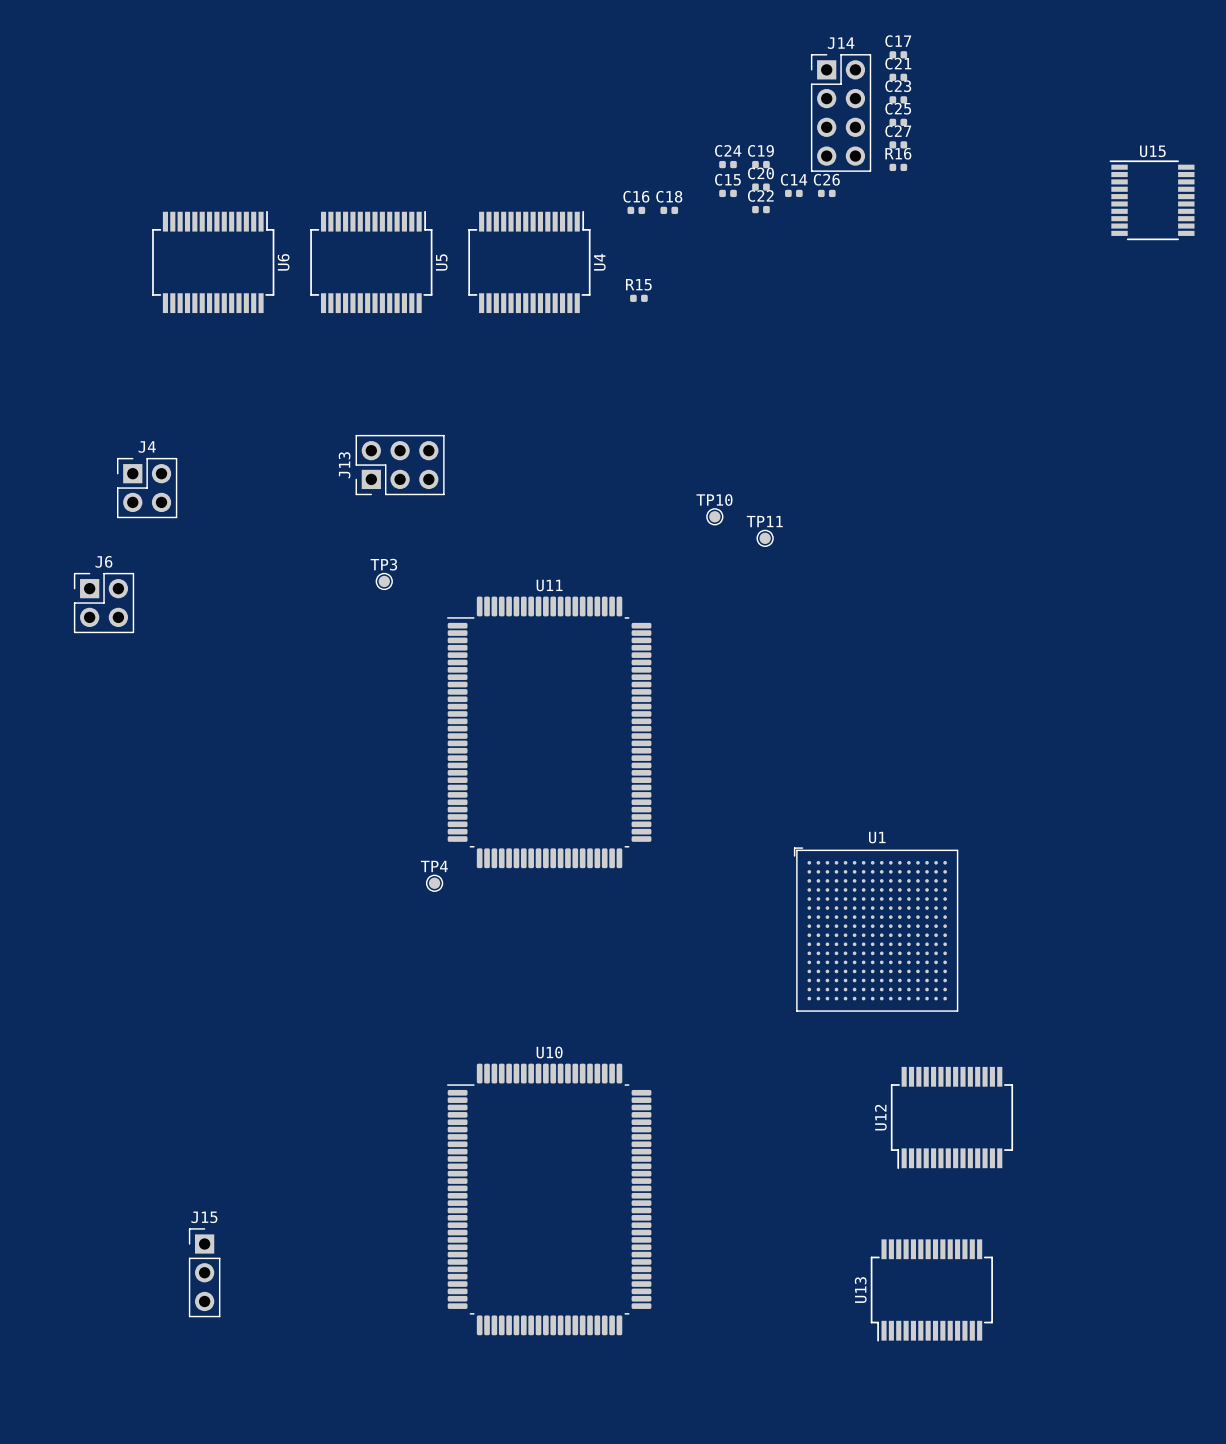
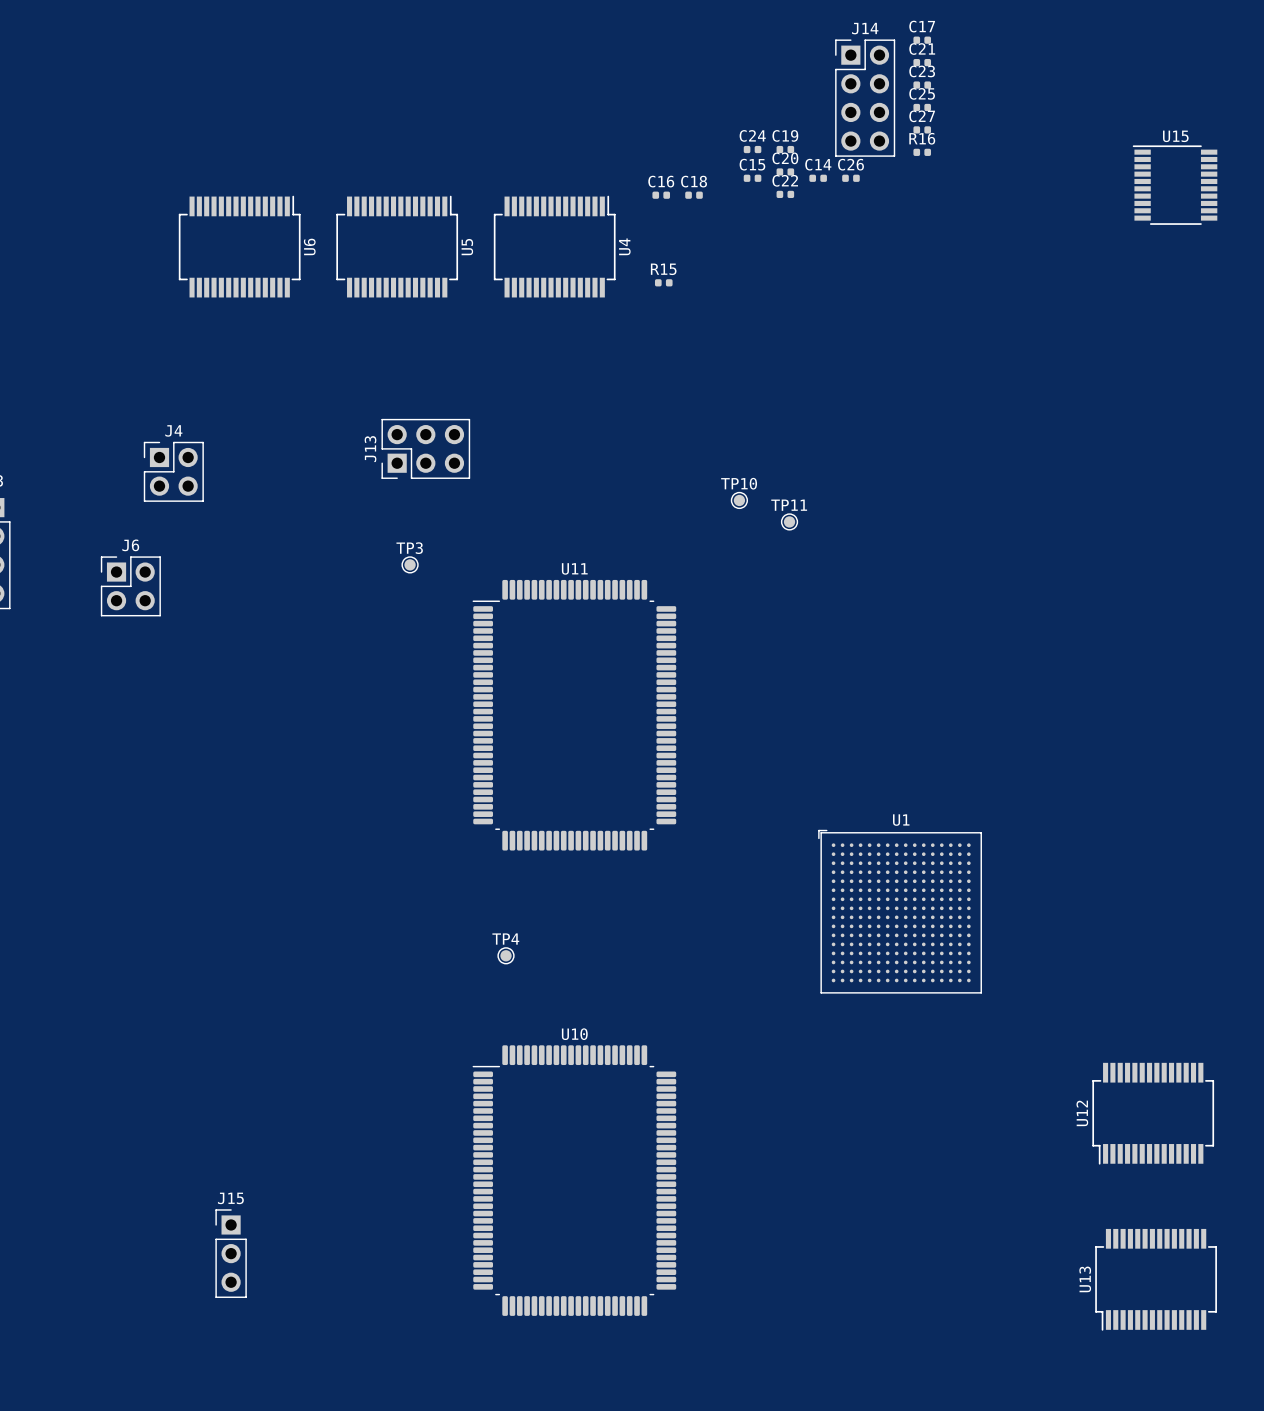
TP4 position: (434, 883) -> (506, 955)
U12 position: (951, 1117) -> (1153, 1113)
U13 position: (931, 1290) -> (1156, 1279)

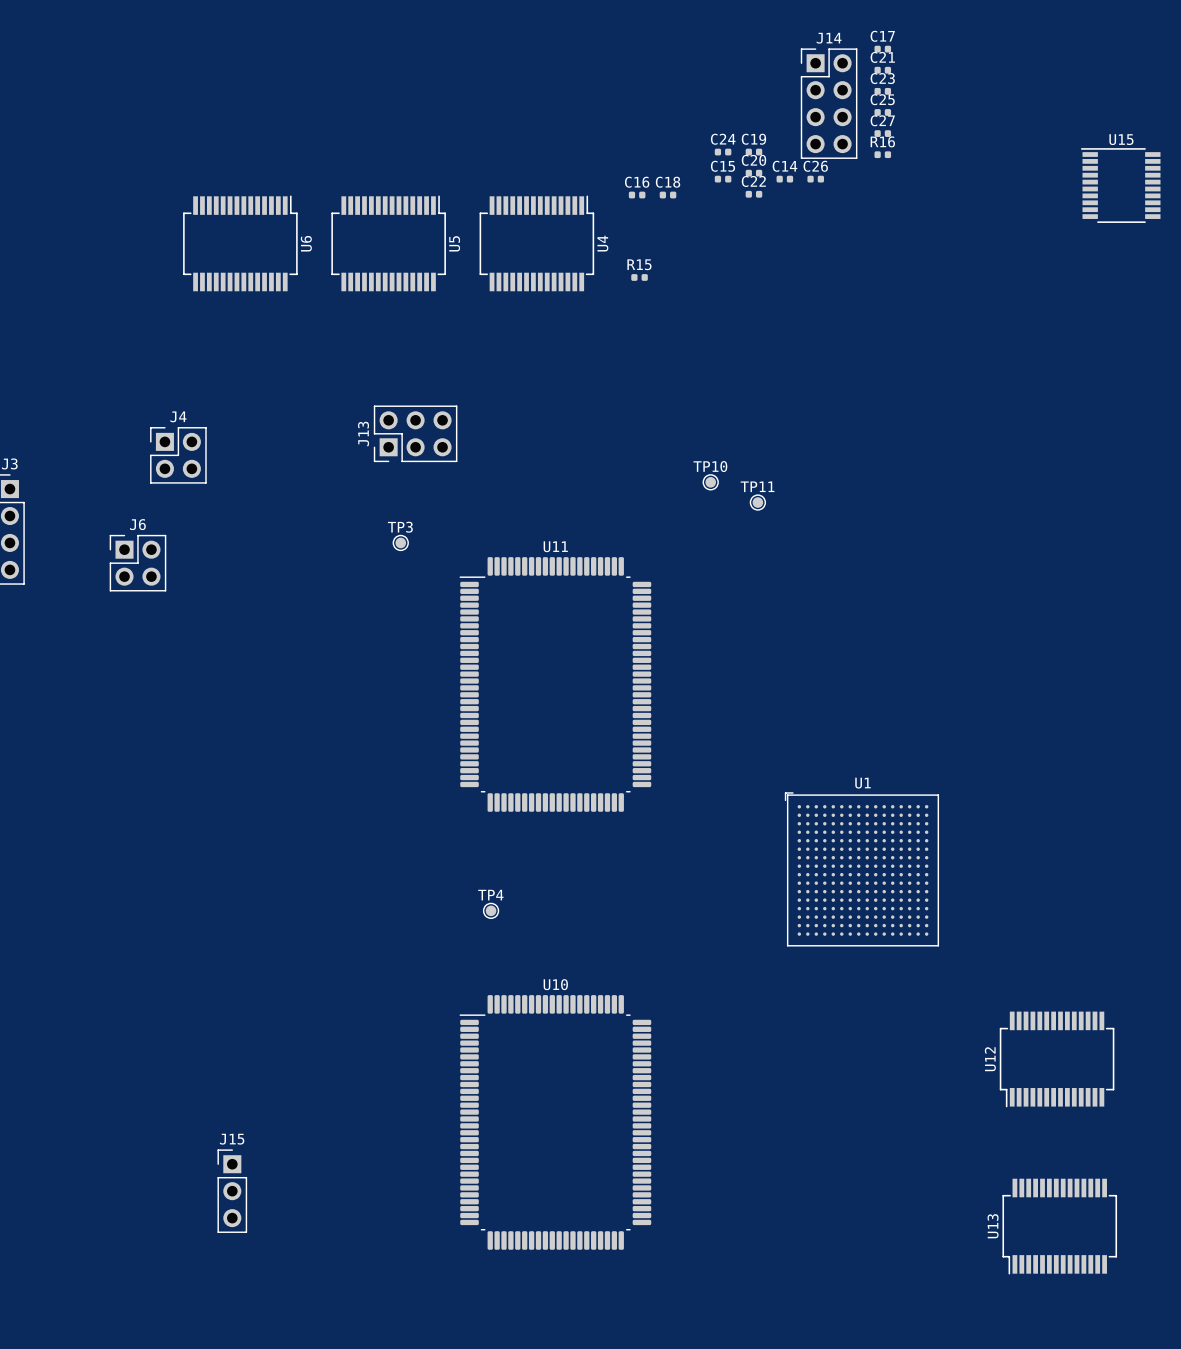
U12 position: (1153, 1113) -> (1057, 1059)
U13 position: (1156, 1279) -> (1059, 1226)

